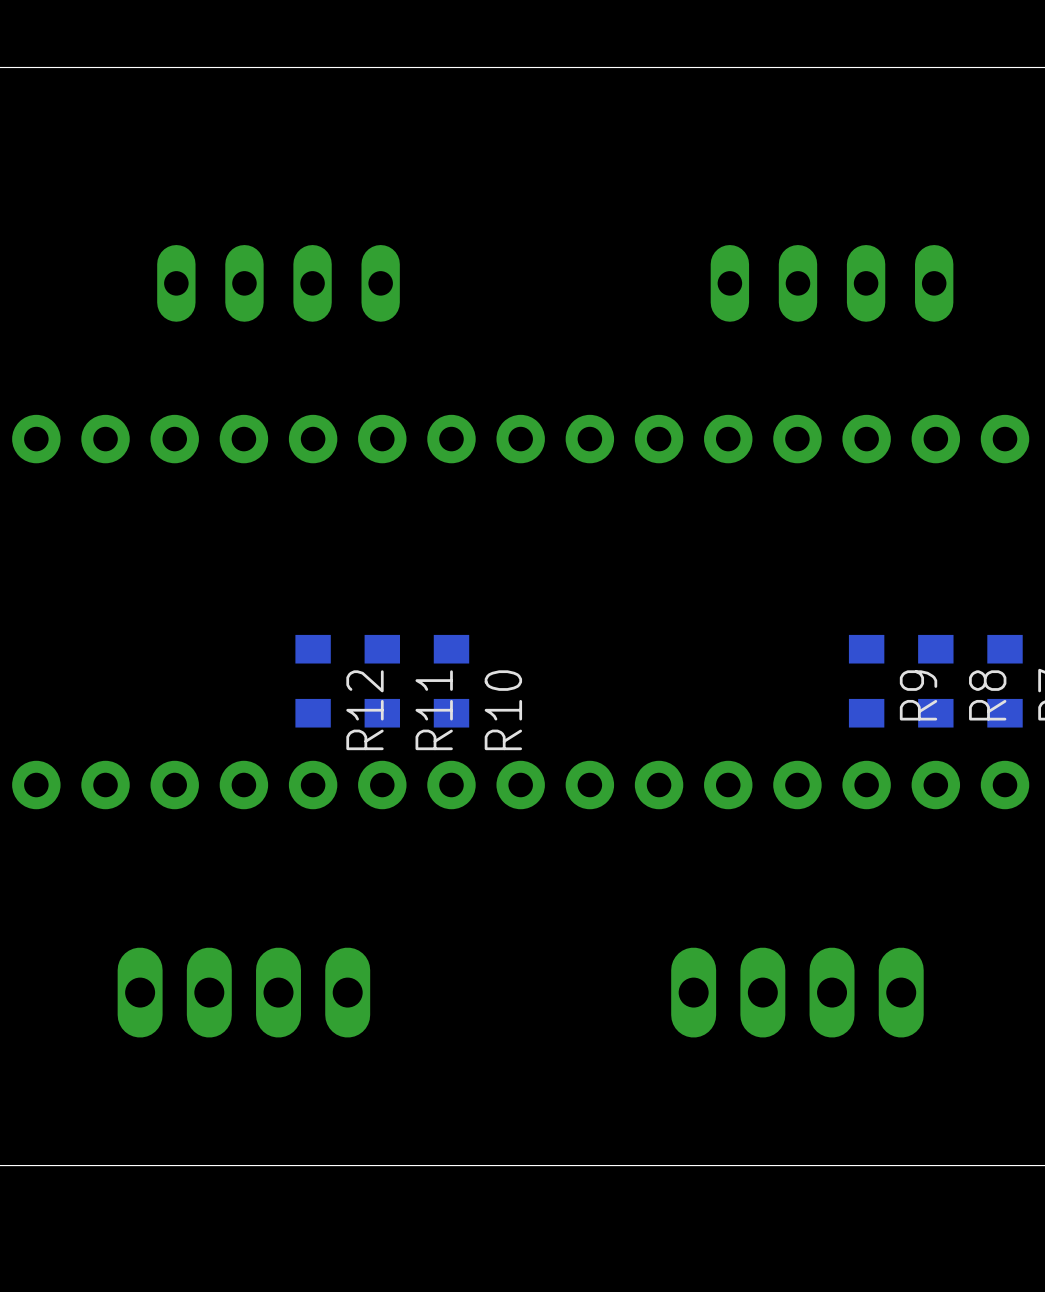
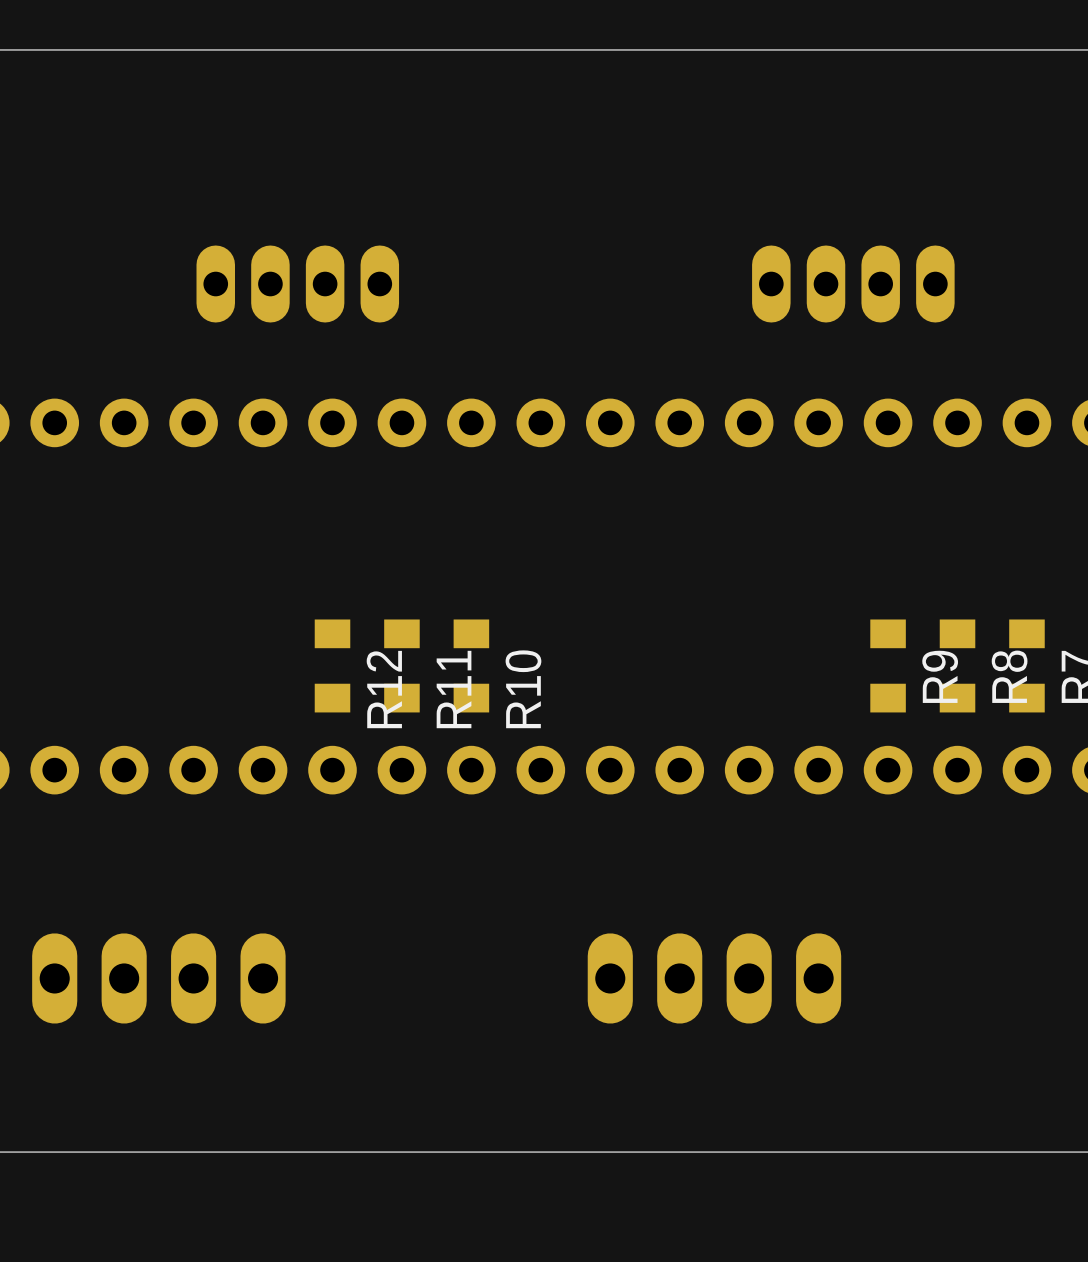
part footprint: [157, 245, 400, 322] -> [196, 245, 400, 323]
part footprint: [710, 245, 954, 322] -> [752, 245, 955, 323]
part position: (243, 992) -> (158, 978)
part position: (797, 992) -> (714, 978)

